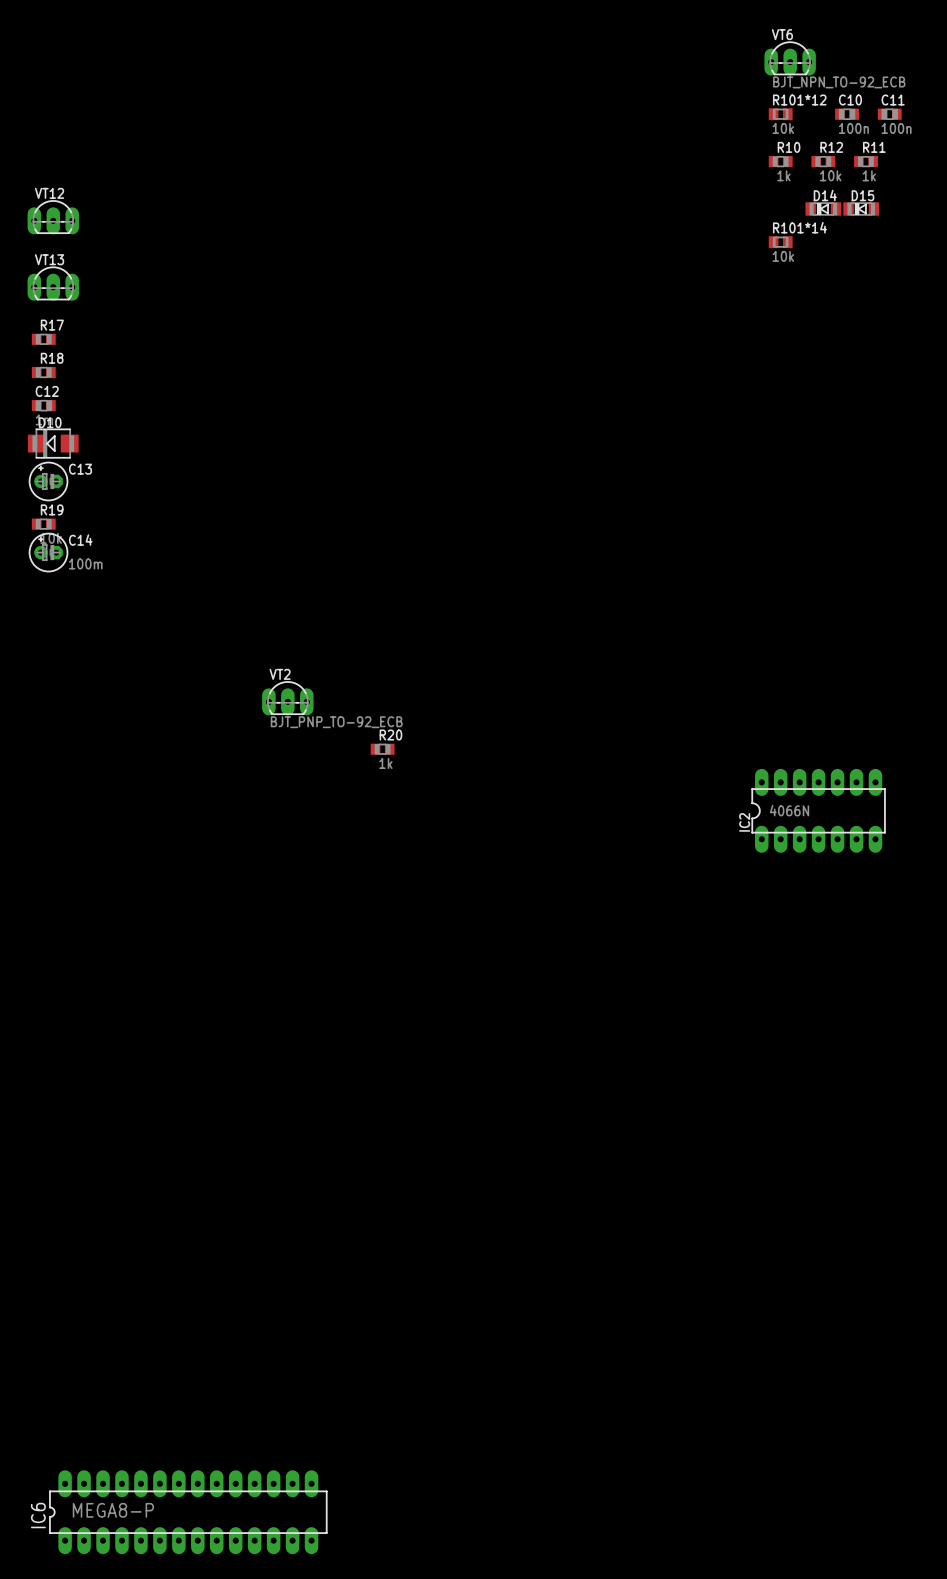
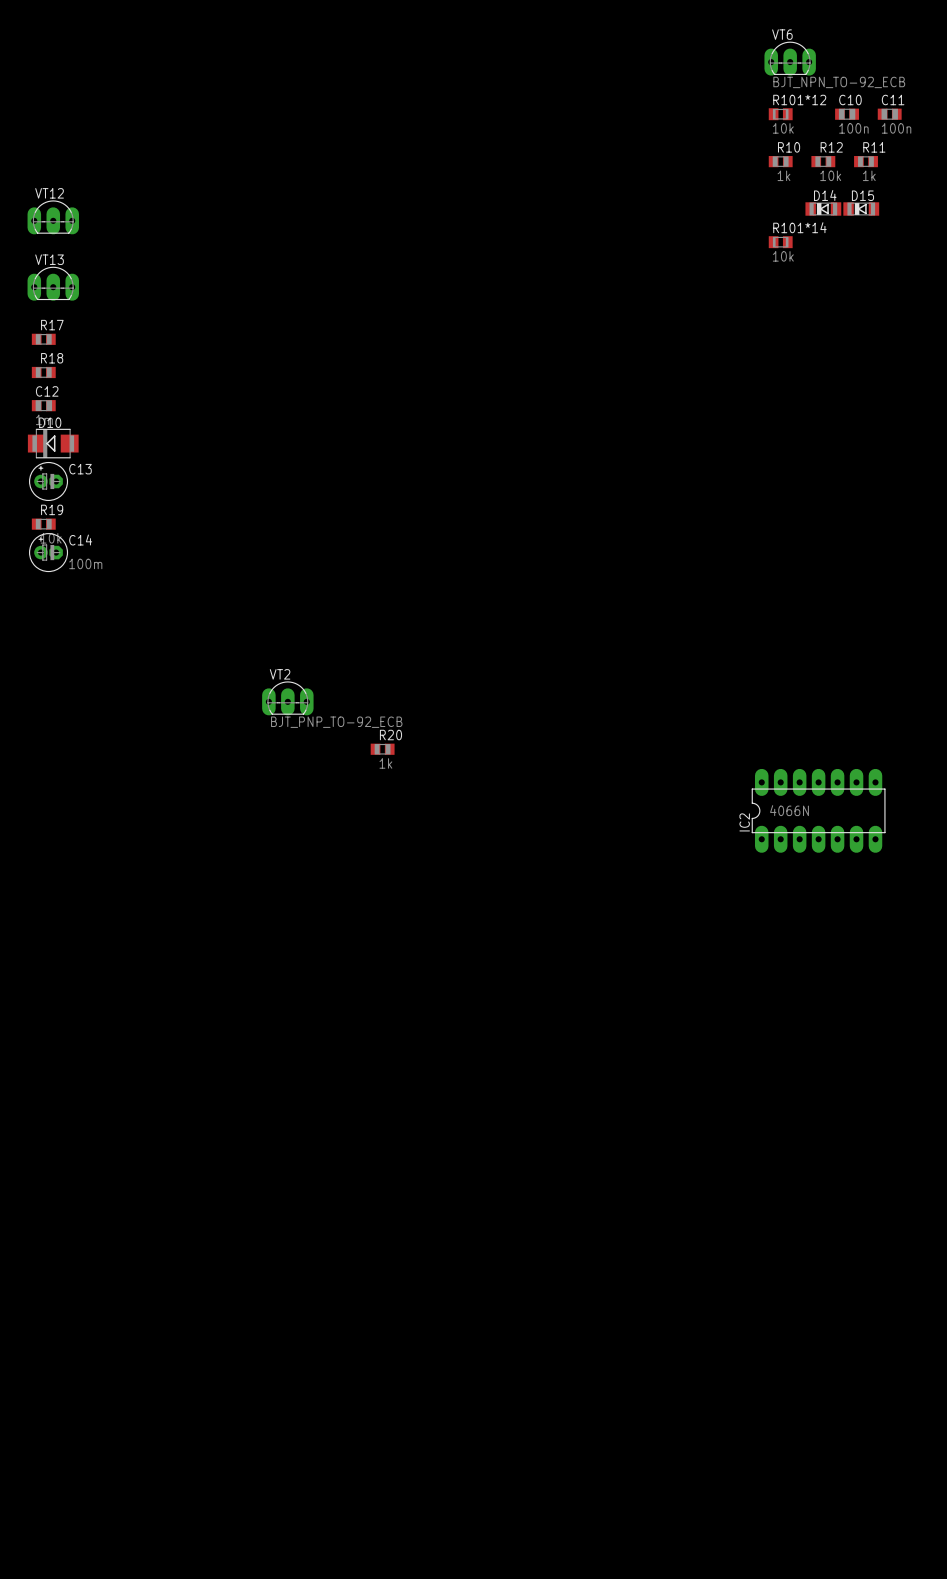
IC6: MEGA8-P (188, 1512) -> none

